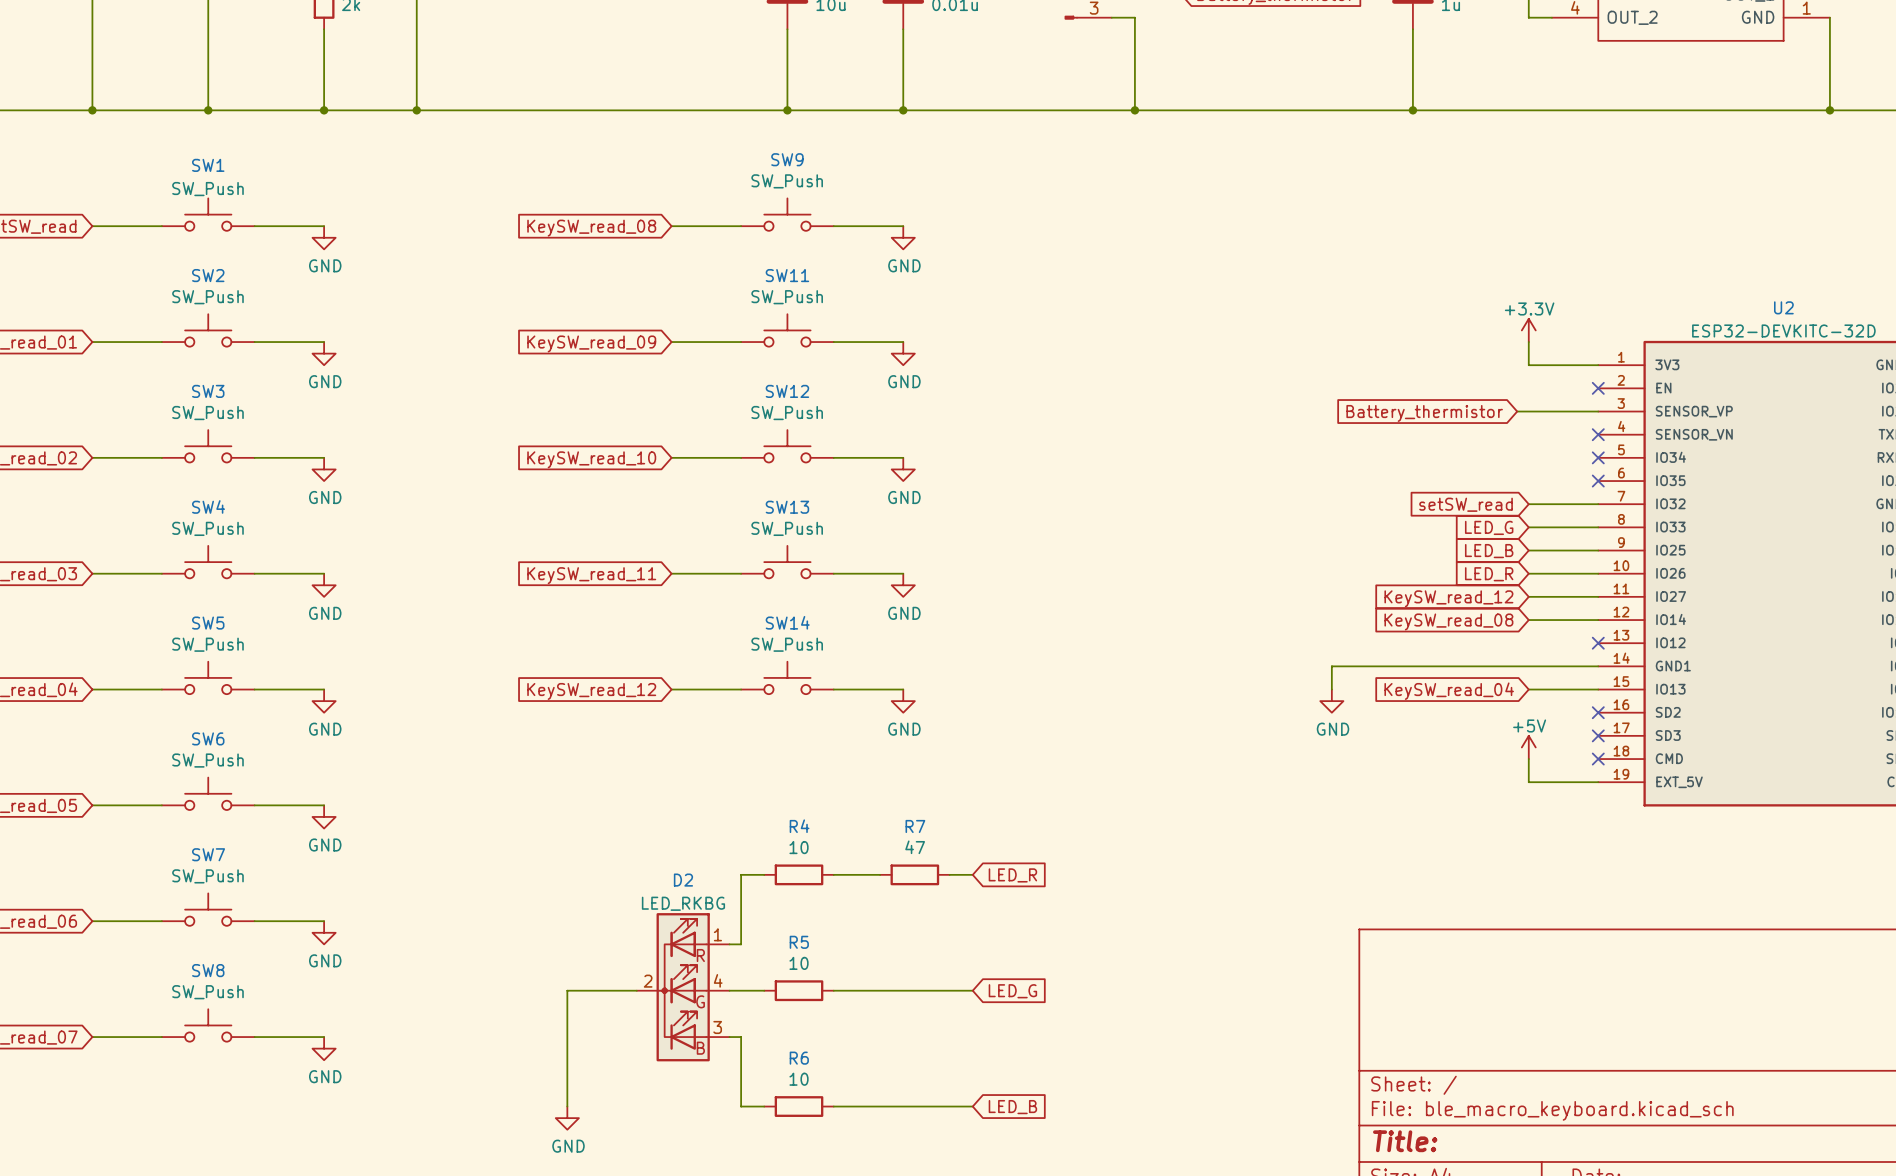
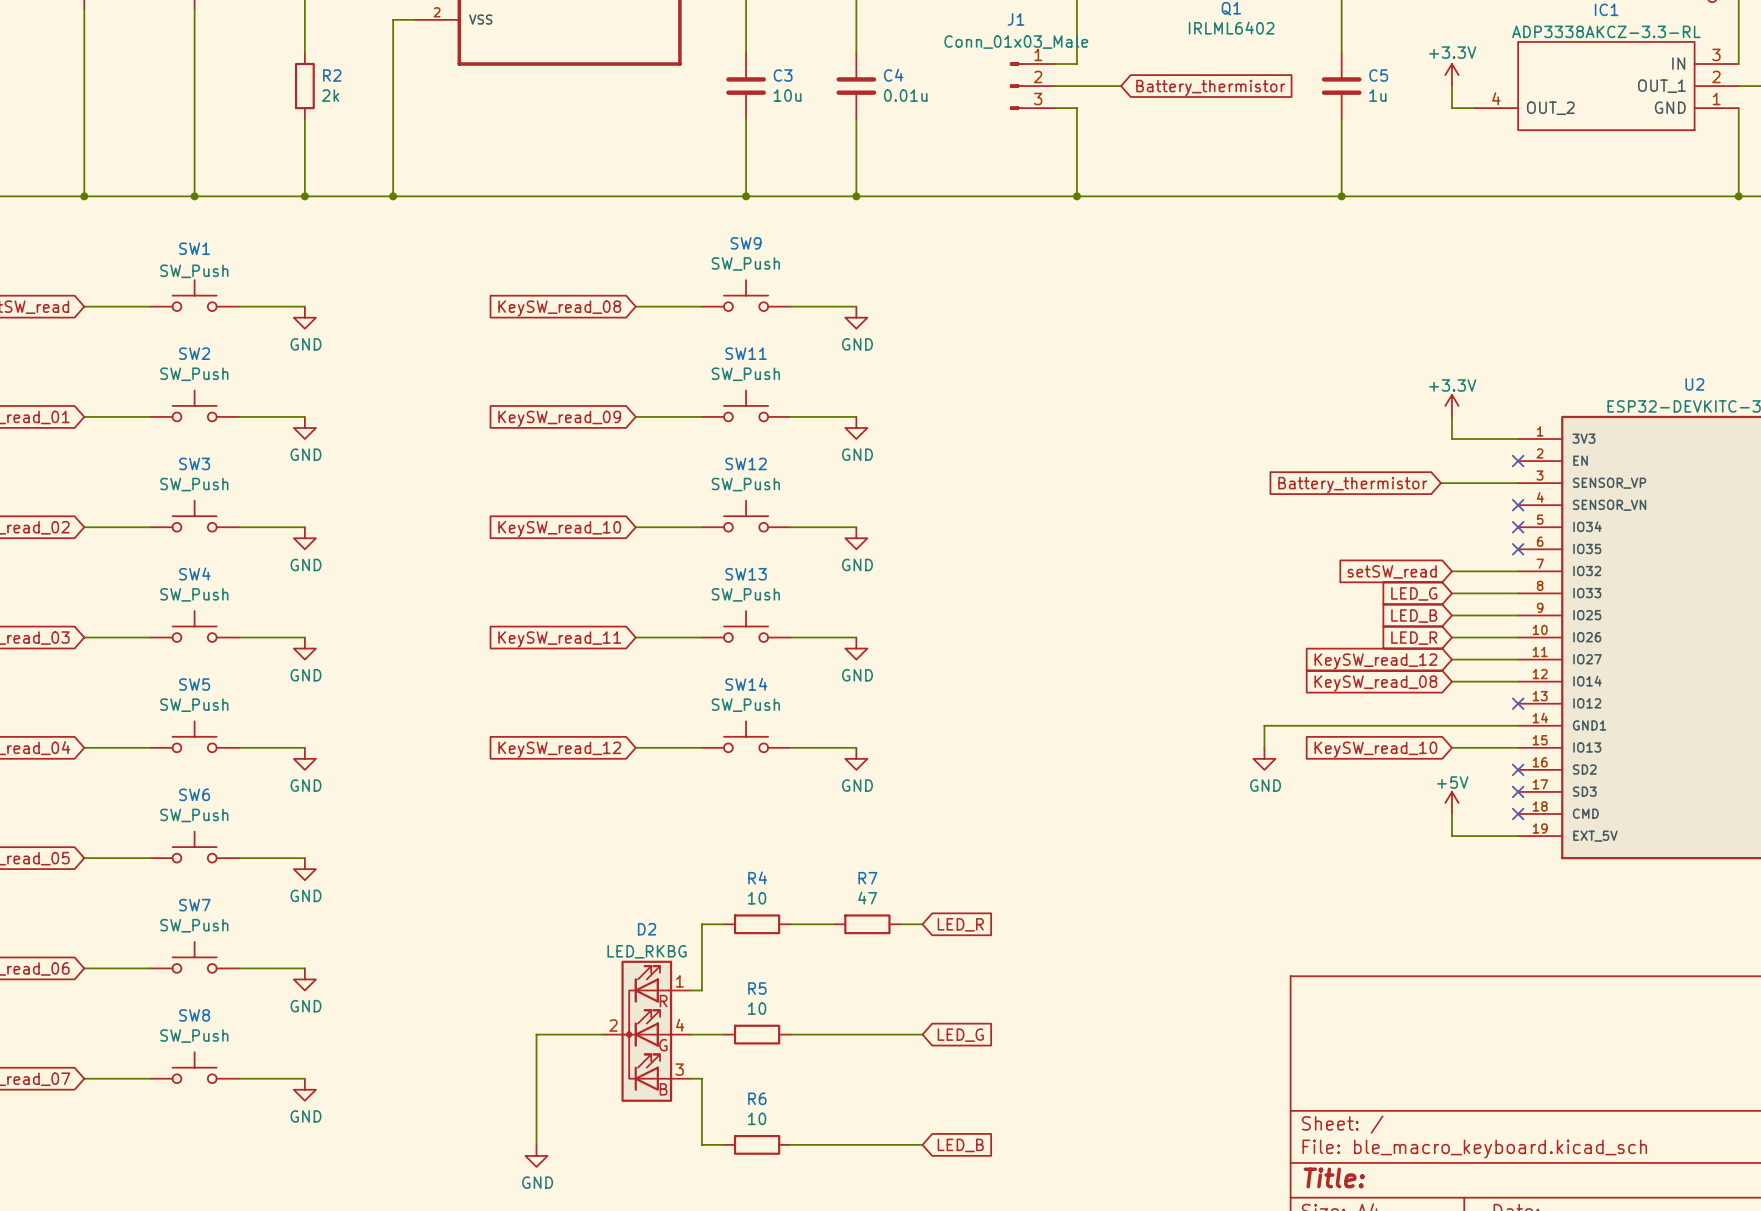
global label: KeySW_read_04 (1449, 691) -> KeySW_read_10 (1375, 749)

